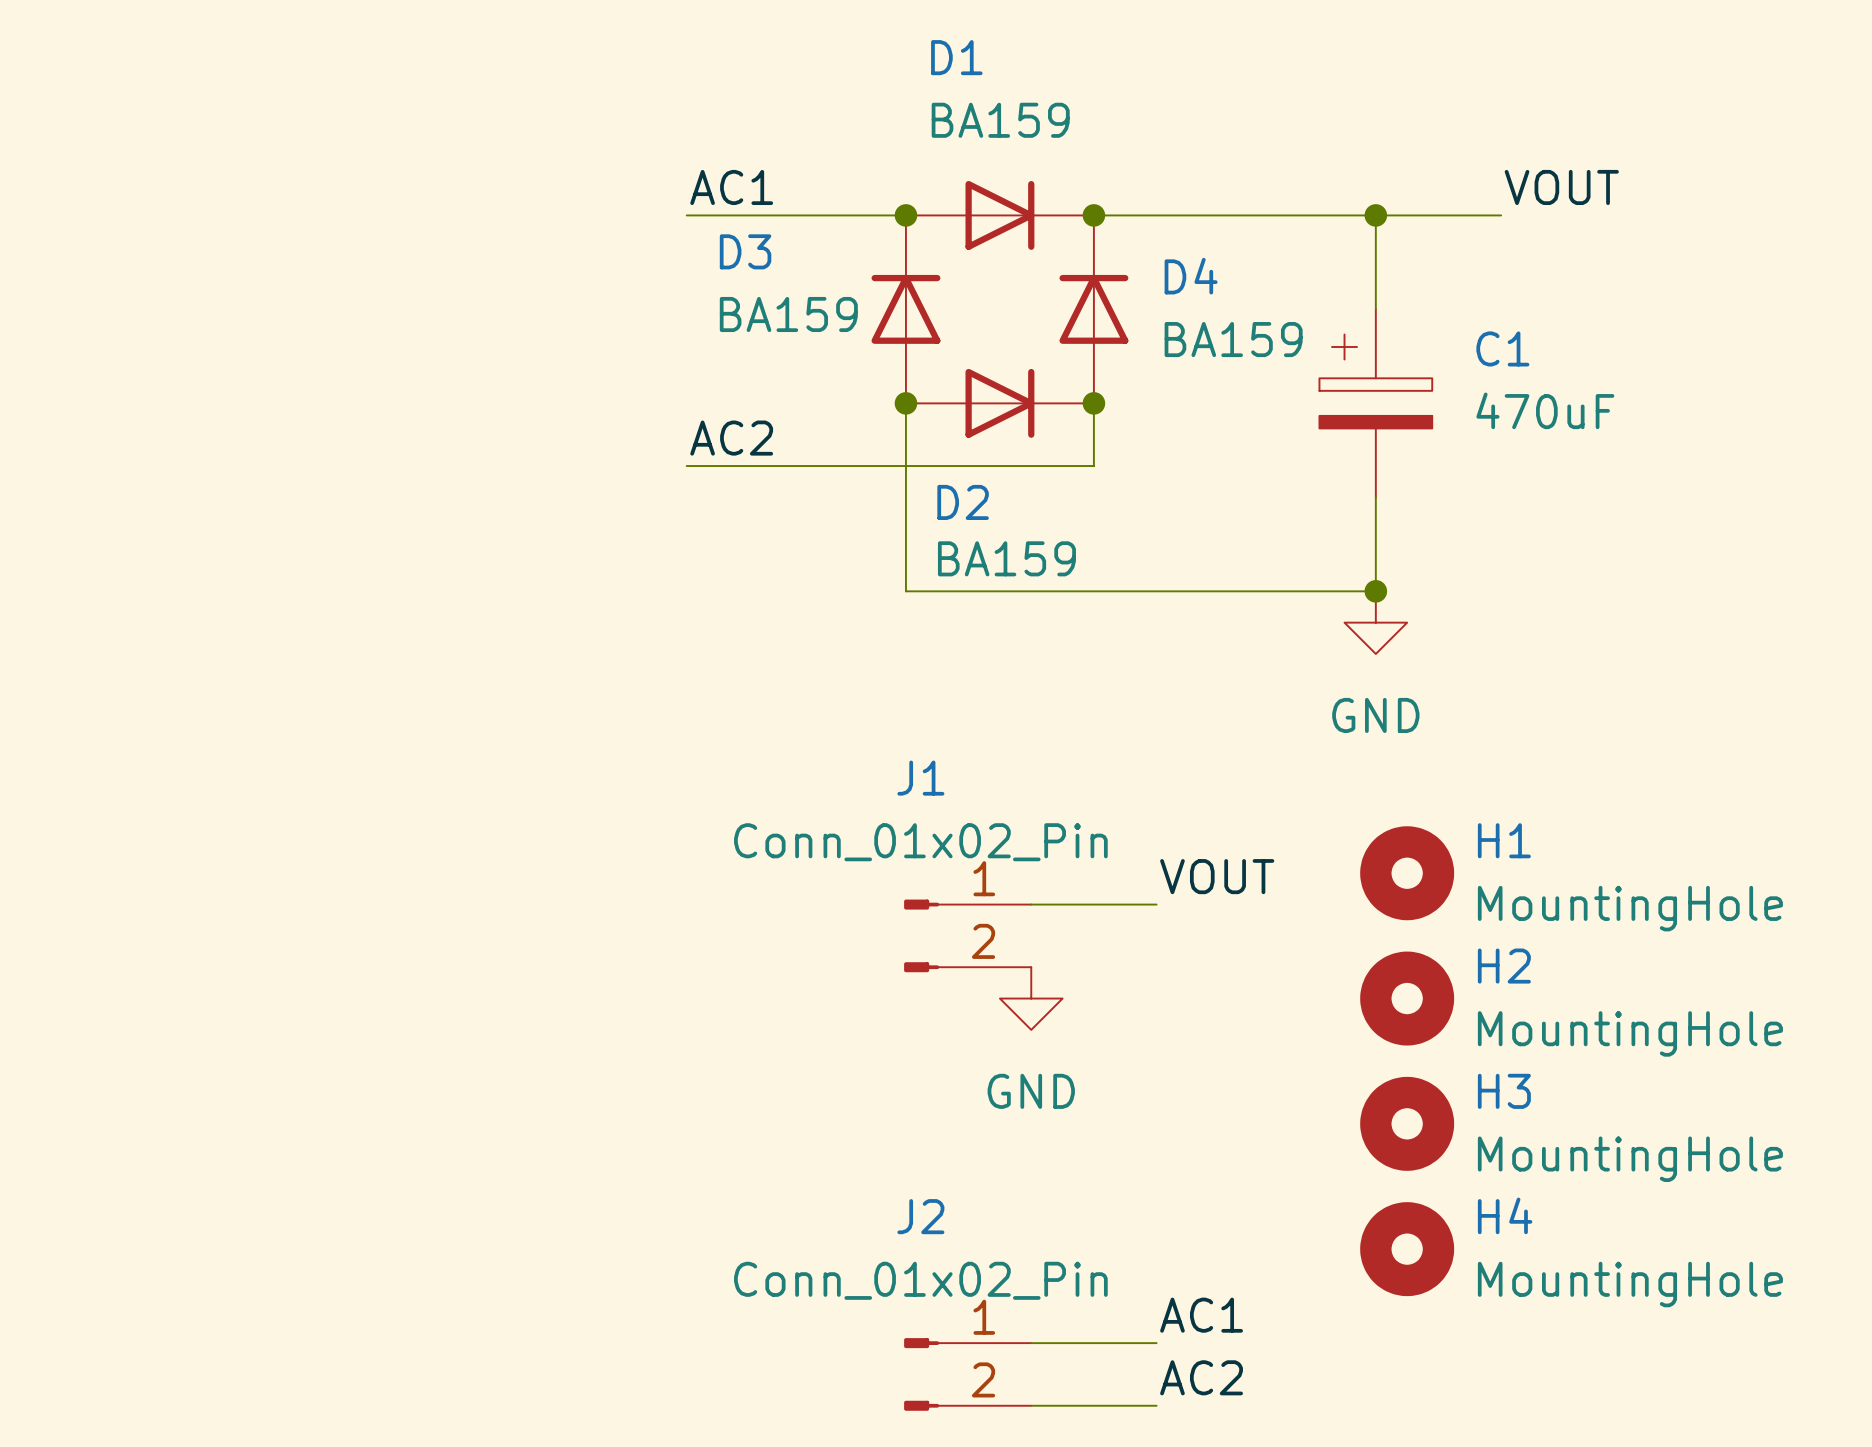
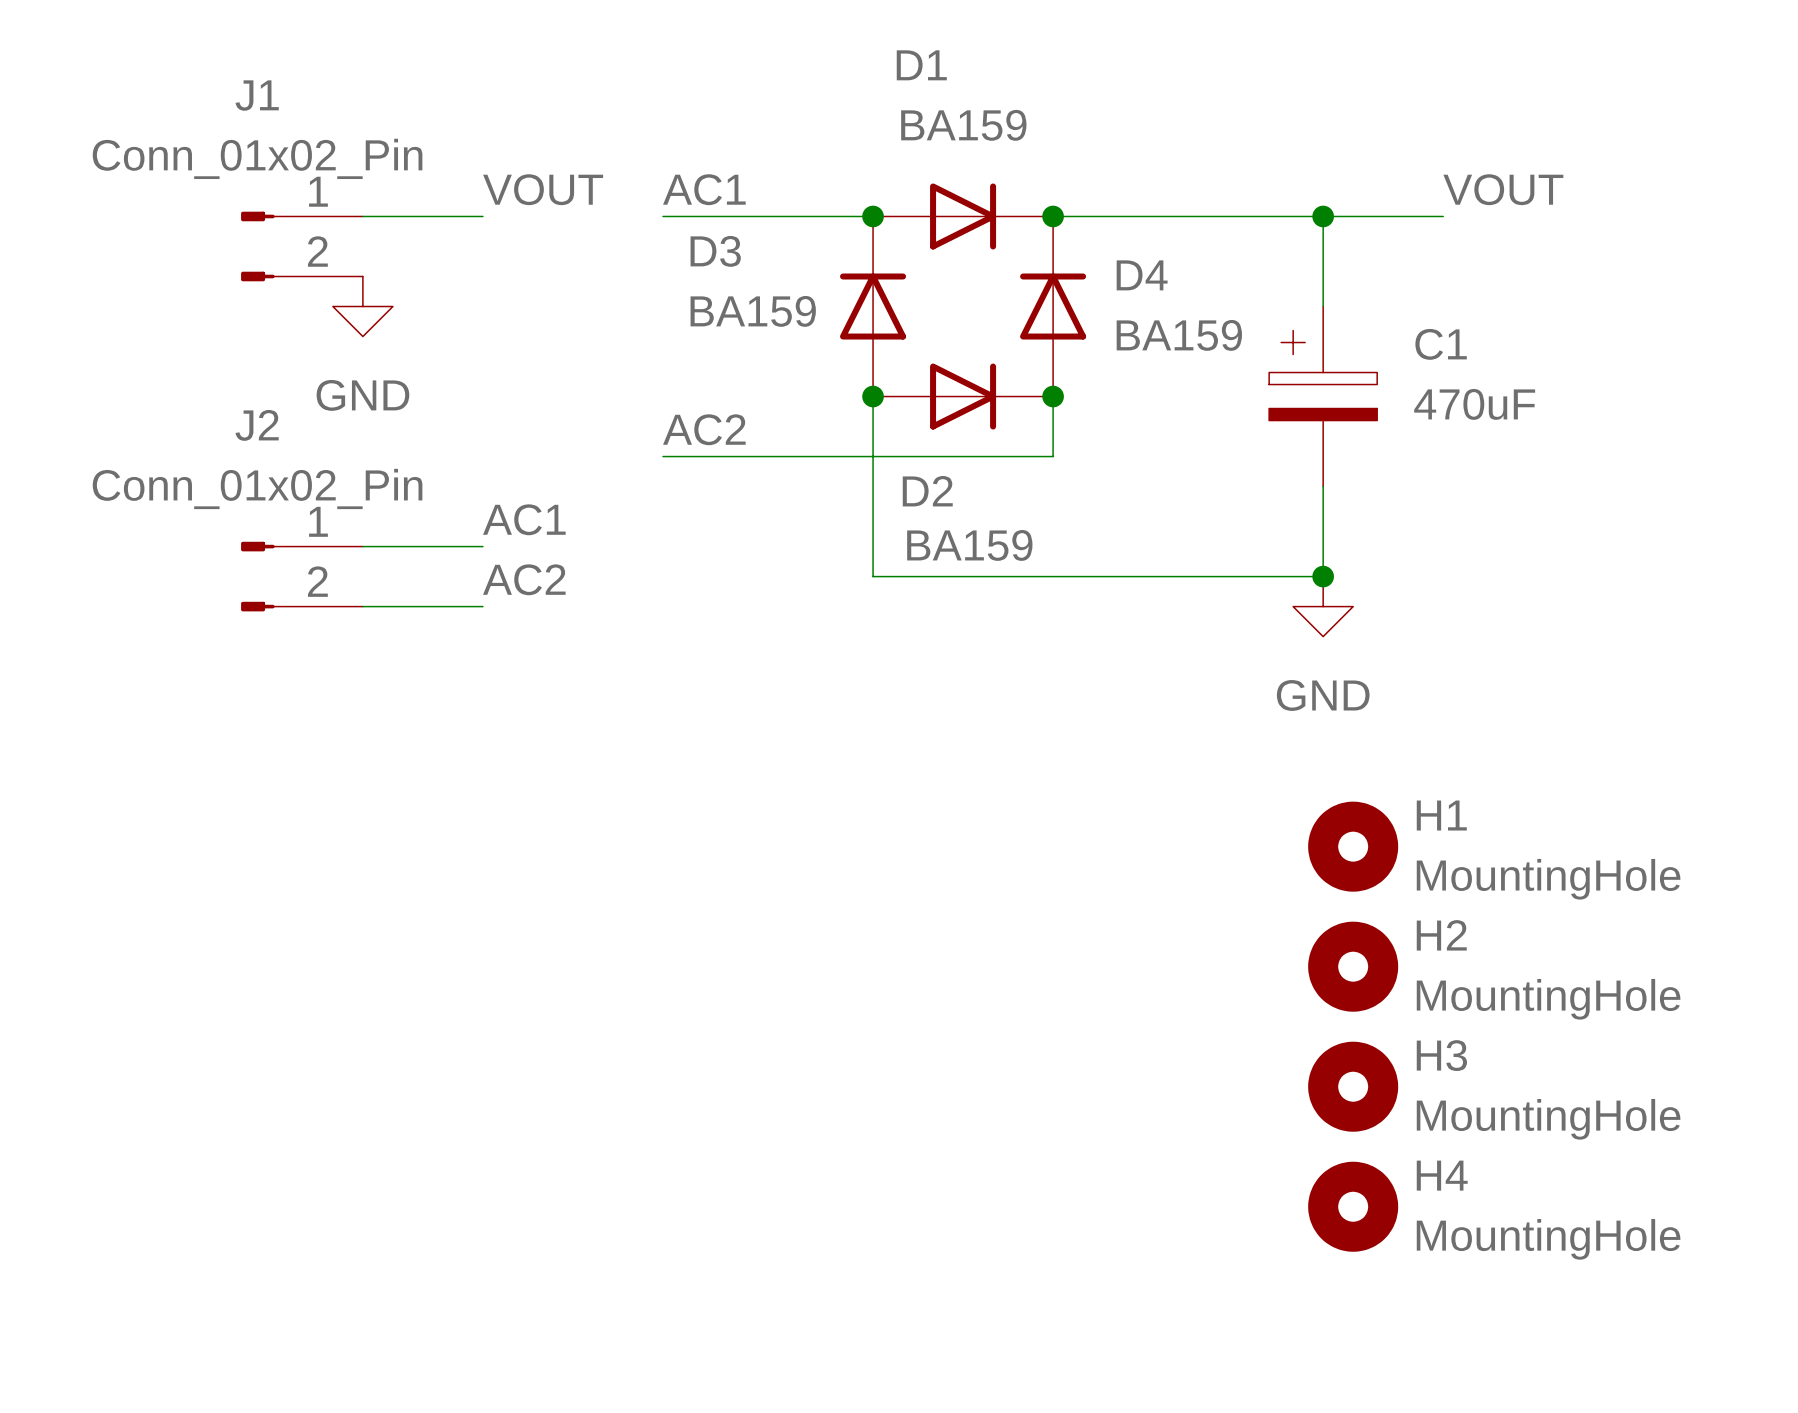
label: none -> VOUT (543, 189)
wire: none -> (362, 216) (482, 216)
power symbol: none -> GND (362, 306)
label: none -> AC1 (524, 519)
wire: none -> (362, 546) (482, 546)
label: none -> AC2 (524, 579)
wire: none -> (362, 606) (482, 606)
label: VOUT (1217, 876) -> none
wire: (1031, 904) (1156, 904) -> none
J1 position: (967, 935) -> (301, 246)
power symbol: GND (1031, 998) -> none
label: AC1 (1201, 1315) -> none
wire: (1031, 1343) (1156, 1343) -> none
J2 position: (967, 1374) -> (301, 576)
label: AC2 (1201, 1377) -> none
wire: (1031, 1405) (1156, 1405) -> none

